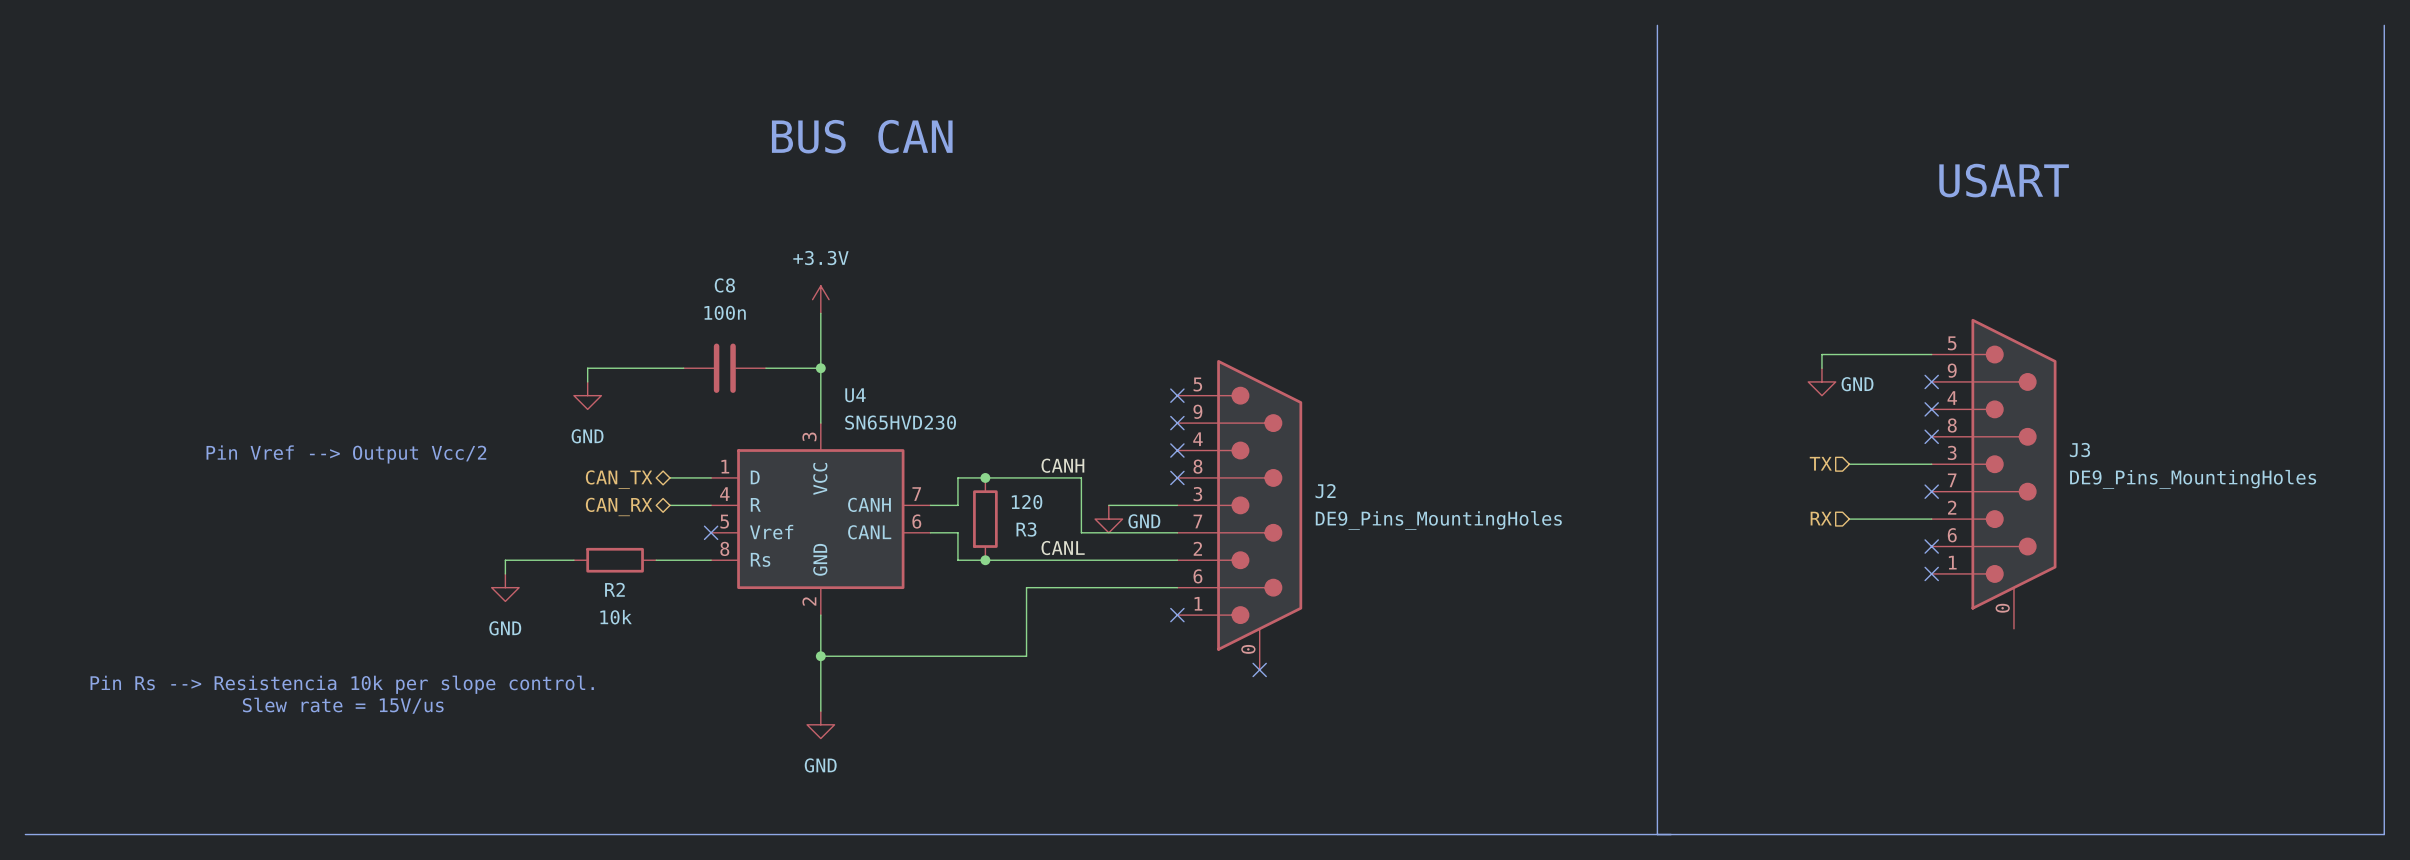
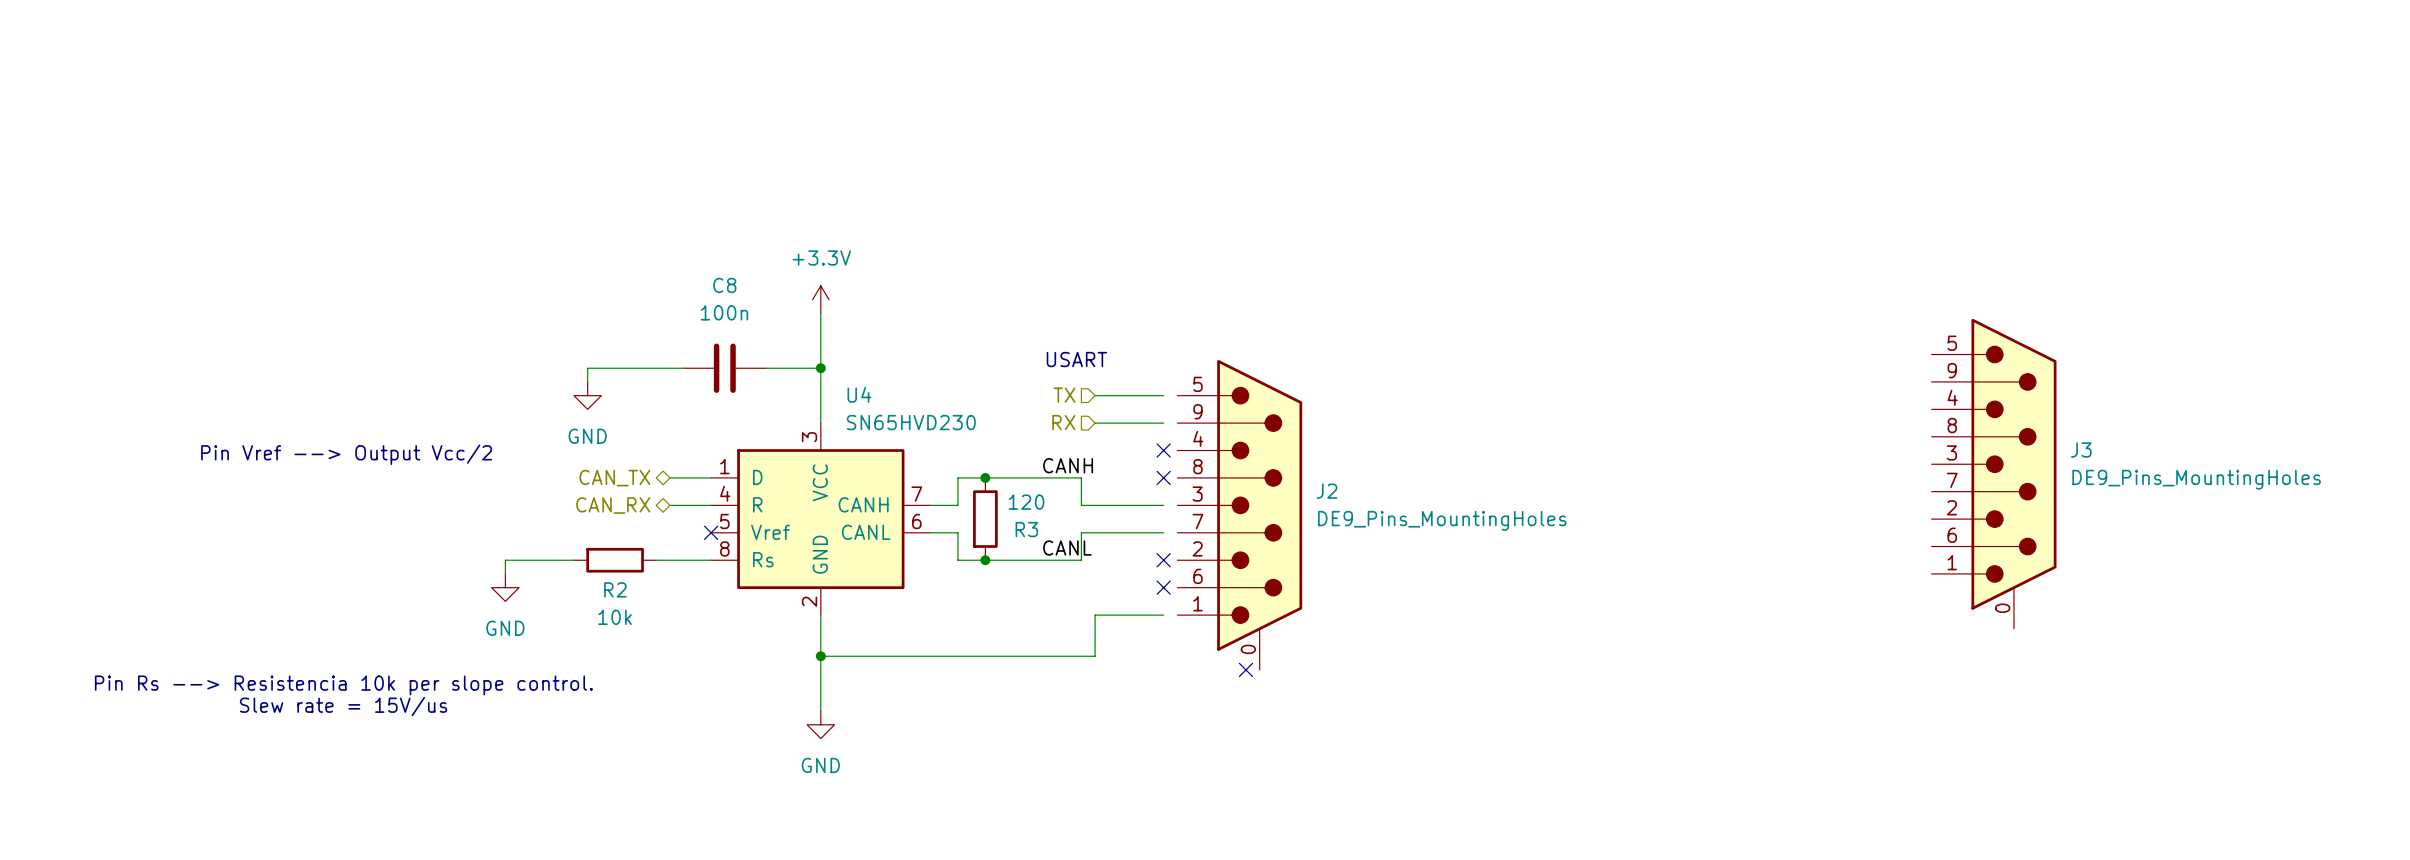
line: (1657, 25) (1657, 834) -> none
line: (2384, 25) (2384, 834) (25, 834) -> none
text: BUS CAN (862, 136) -> none
text: USART (2004, 180) -> none
wire: (1931, 354) (1821, 354) (1821, 368) -> none
text: none -> USART (1076, 359)
power symbol: GND (1821, 381) -> none
no-connect mark: (1931, 381) -> none
hierarchical label: none -> TX (1064, 395)
wire: none -> (1095, 395) (1163, 395)
no-connect mark: (1177, 395) -> none
no-connect mark: (1931, 409) -> none
hierarchical label: none -> RX (1063, 422)
wire: none -> (1095, 423) (1163, 423)
no-connect mark: (1177, 423) -> none
no-connect mark: (1931, 436) -> none
no-connect mark position: (1177, 450) -> (1163, 450)
hierarchical label: TX (1820, 463) -> none
wire: (1849, 464) (1931, 464) -> none
no-connect mark position: (1177, 477) -> (1163, 477)
no-connect mark: (1931, 491) -> none
wire: (1081, 505) (1081, 532) -> (1081, 505) (1108, 505)
wire: (1163, 505) (1177, 505) -> none
hierarchical label: RX (1821, 518) -> none
power symbol: GND (1108, 519) -> none
wire: (1849, 519) (1931, 519) -> none
wire: (1163, 532) (1177, 532) -> none
no-connect mark: (1931, 546) -> none
wire: (1081, 560) (1177, 560) -> (1081, 560) (1081, 532)
no-connect mark: none -> (1163, 560)
no-connect mark: (1931, 573) -> none
no-connect mark: none -> (1163, 587)
wire: (1177, 587) (1026, 587) (1026, 656) -> (1163, 615) (1095, 615) (1095, 656) (1026, 656)
no-connect mark: (1177, 615) -> none
no-connect mark position: (1259, 669) -> (1245, 669)

